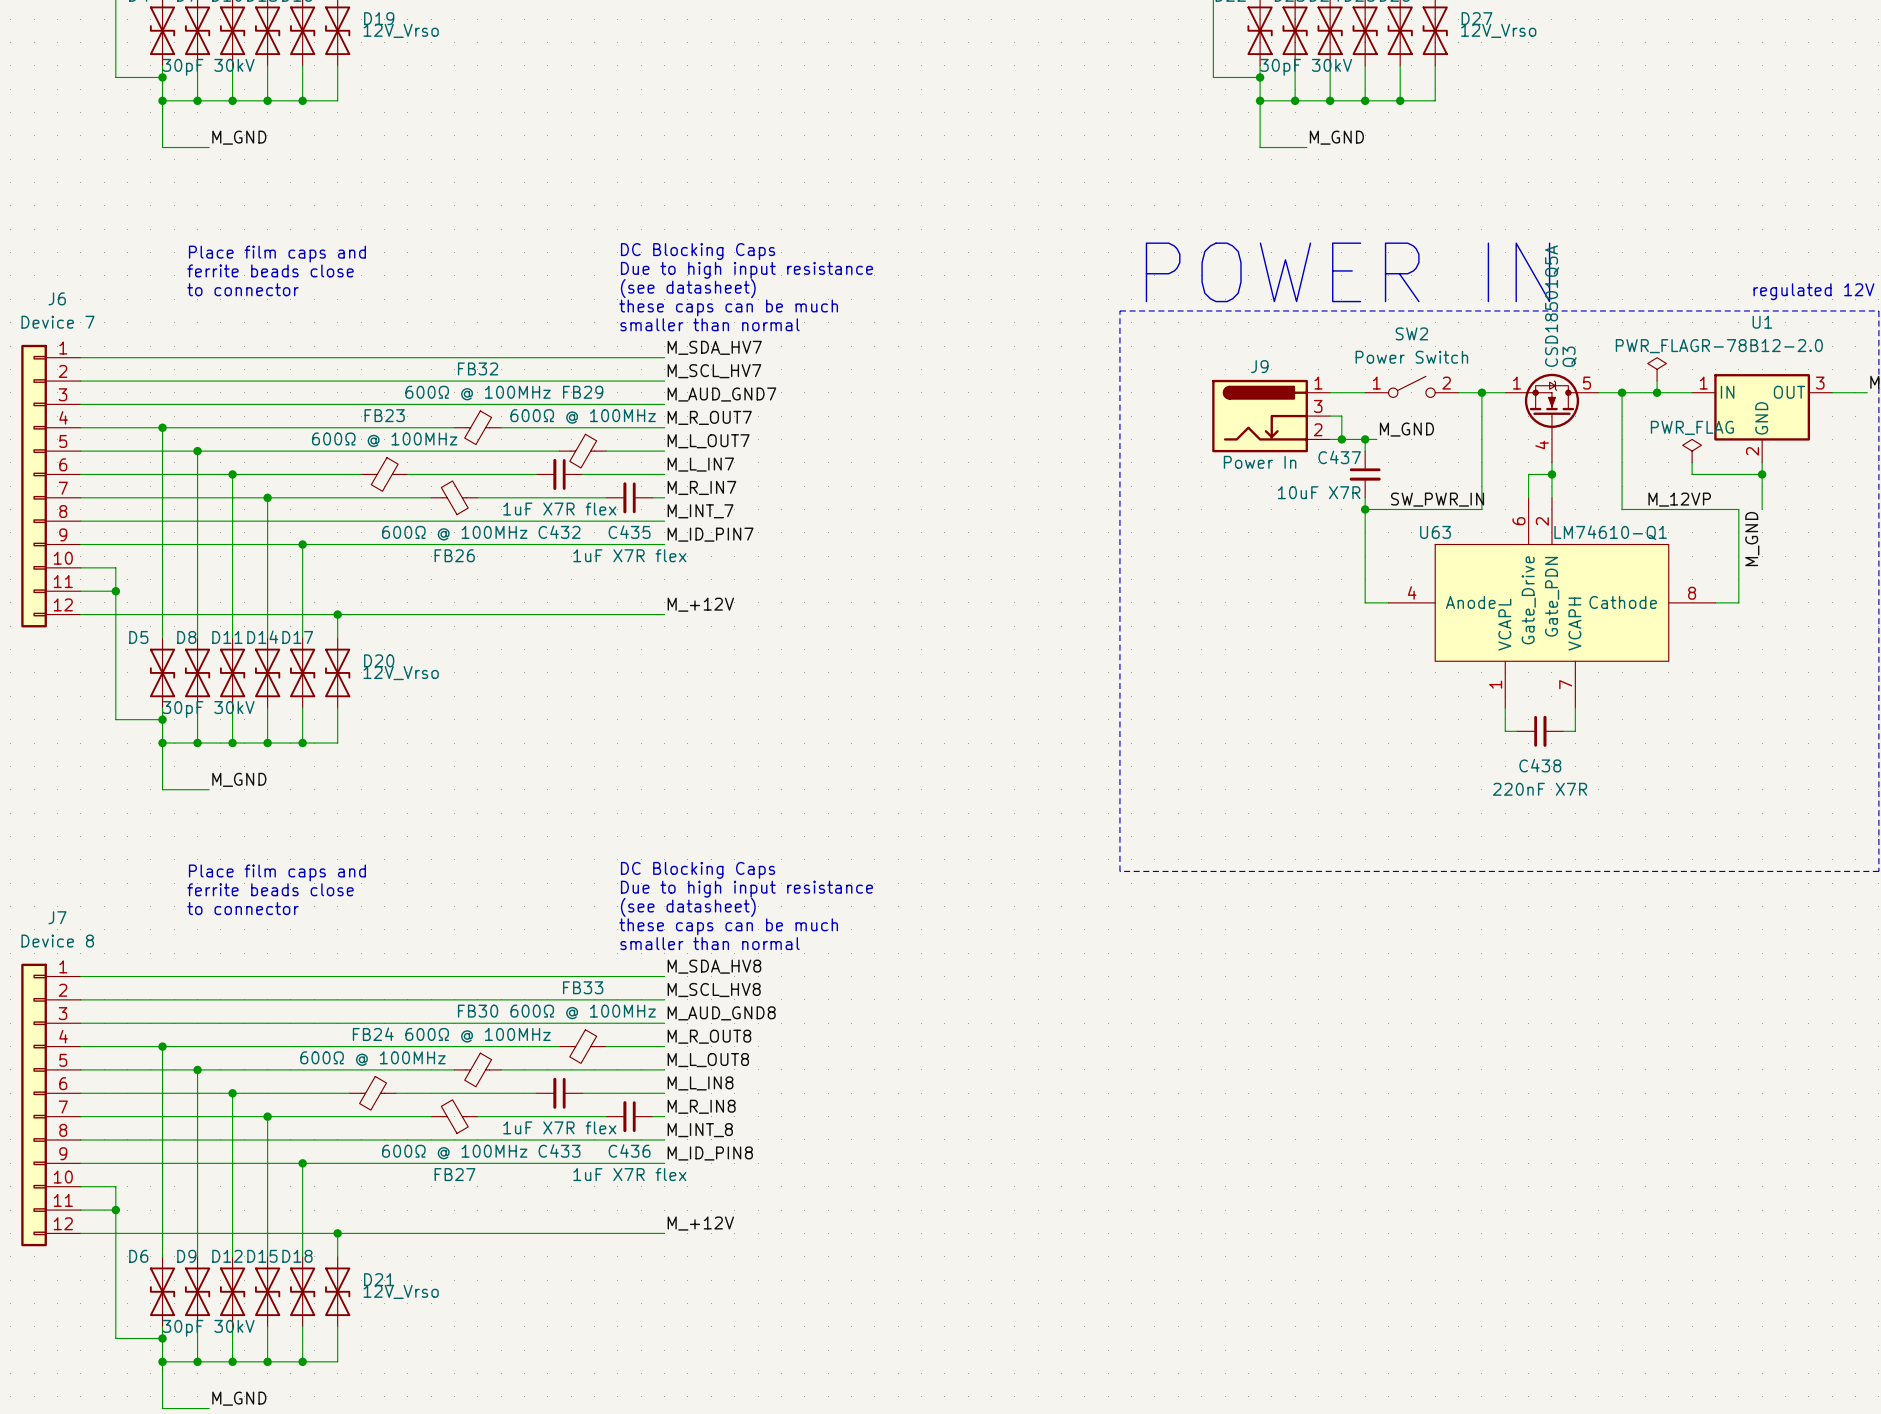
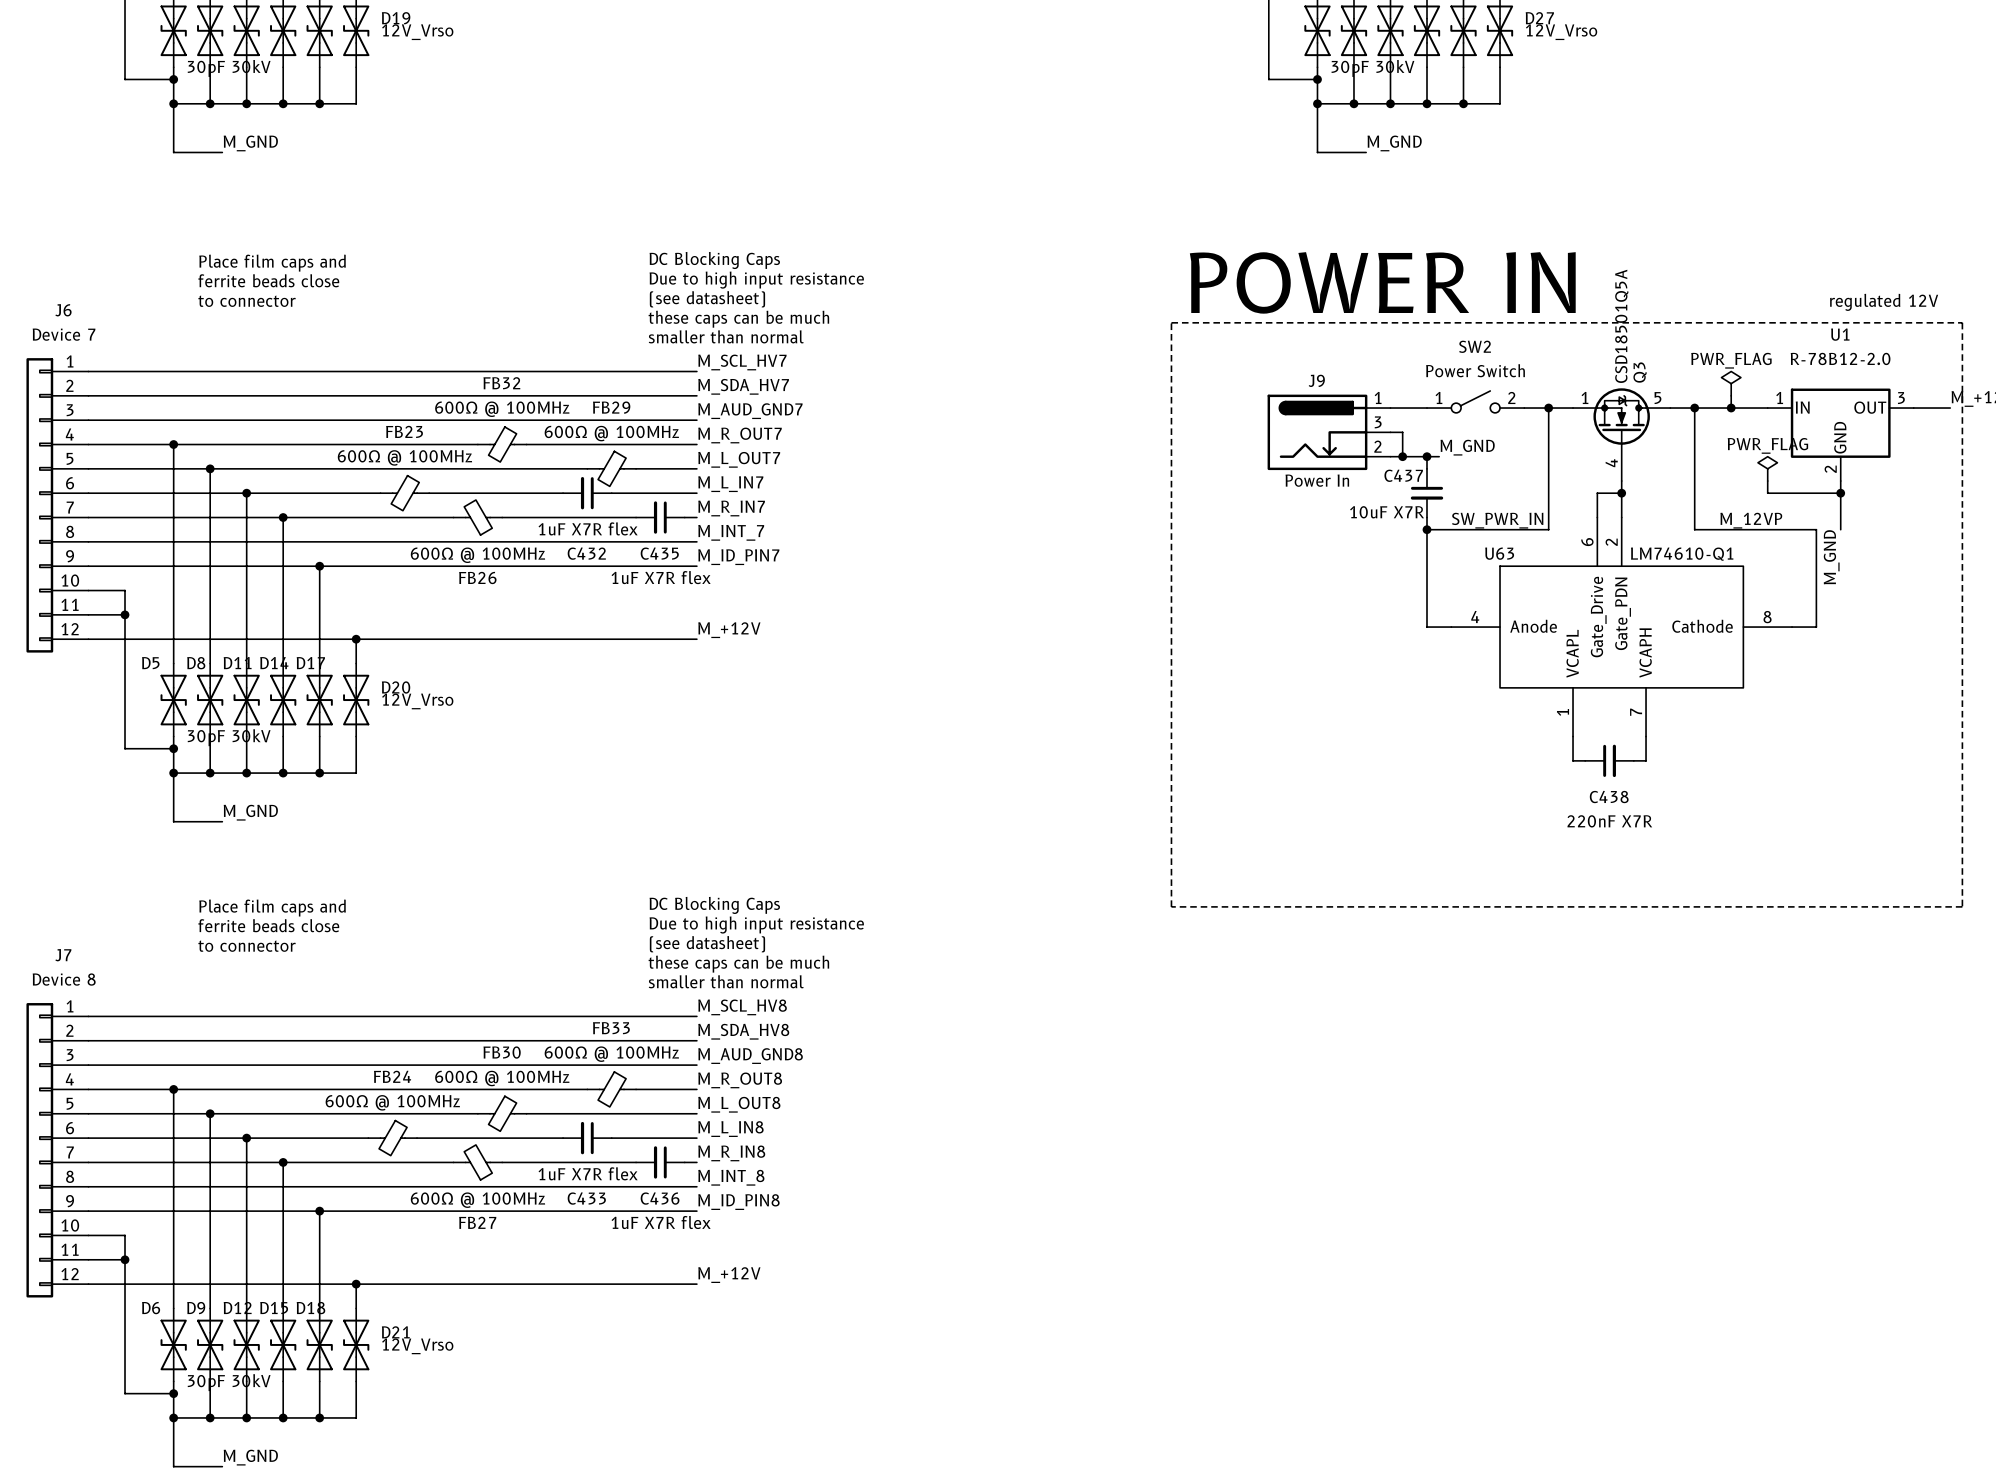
label: M_SDA_HV7 (714, 347) -> M_SCL_HV7 (742, 362)
label: M_SCL_HV7 (714, 371) -> M_SDA_HV7 (743, 386)
label: M_SDA_HV8 (714, 966) -> M_SCL_HV8 (742, 1007)
label: M_SCL_HV8 (714, 990) -> M_SDA_HV8 (743, 1031)

